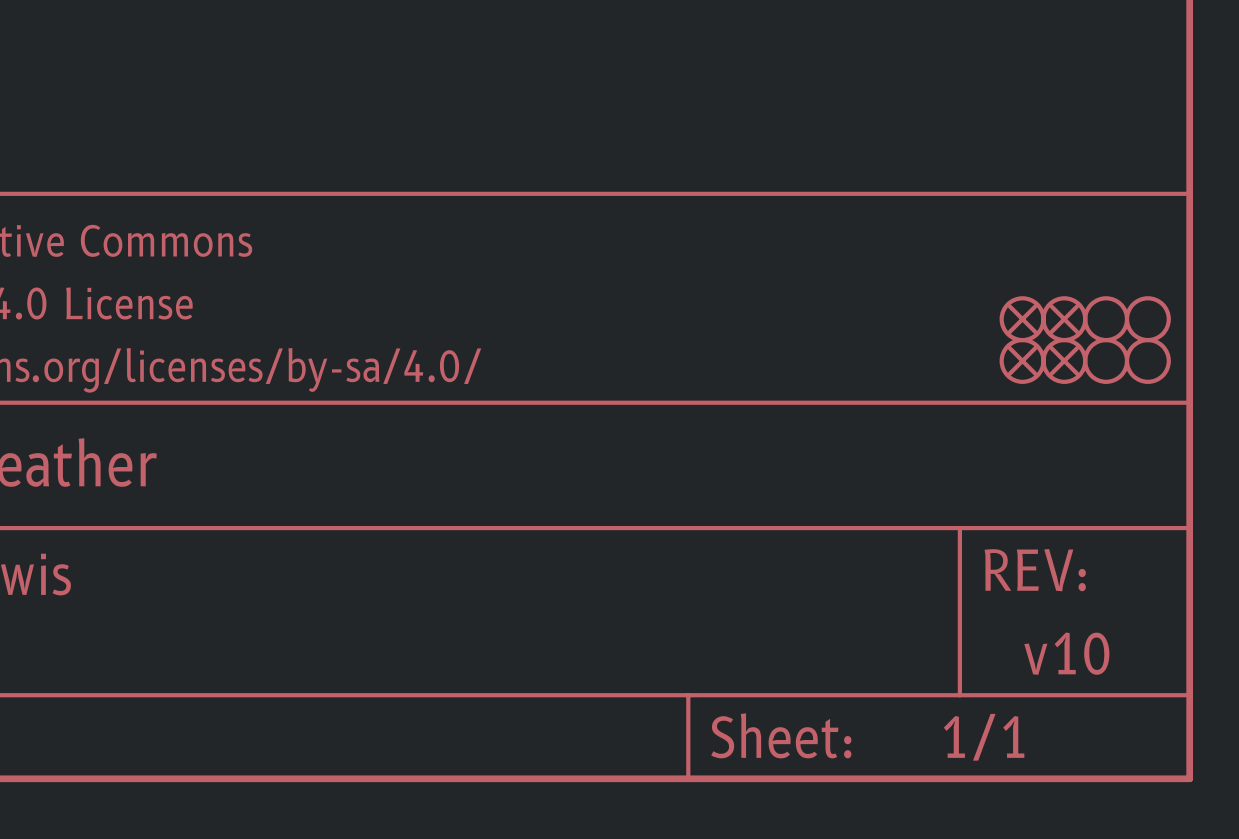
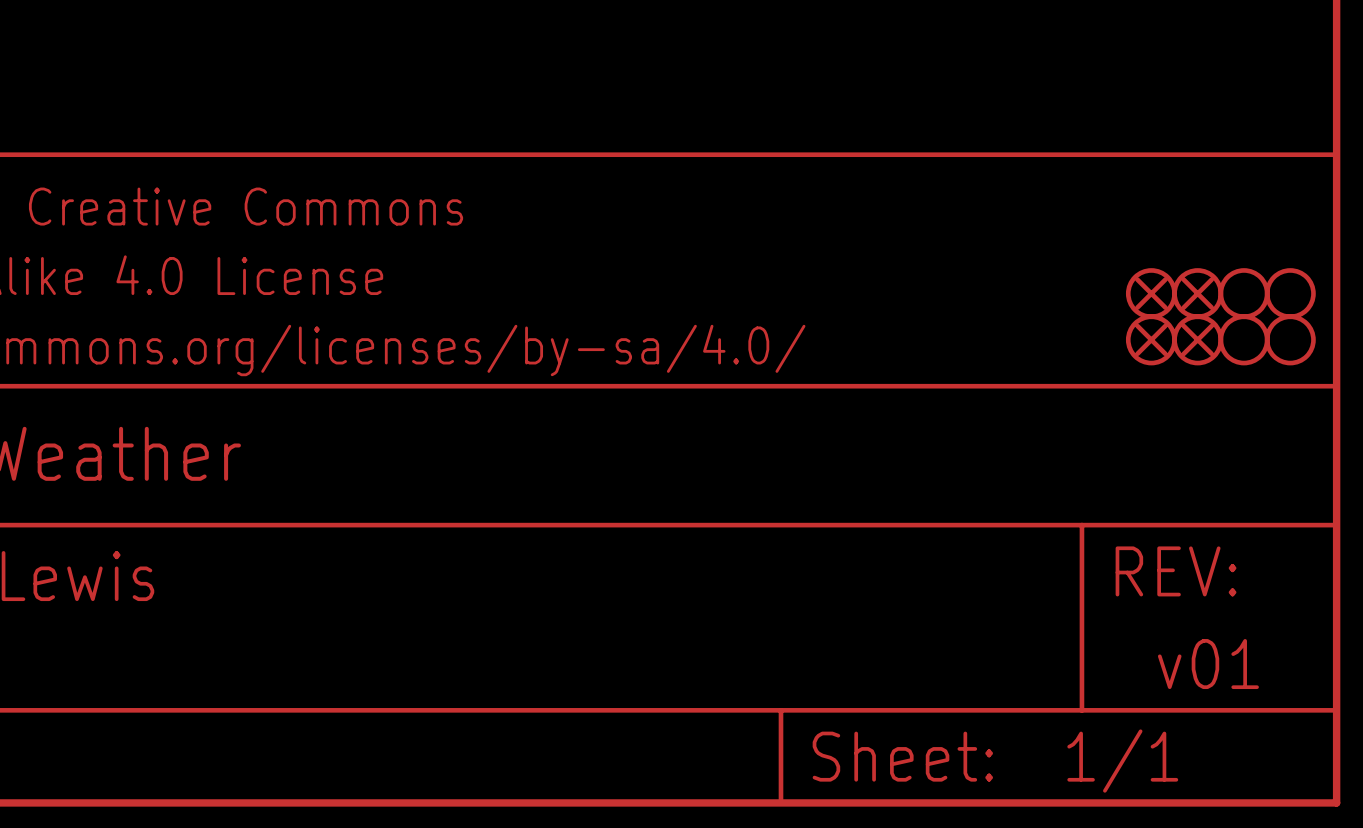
text: v10 (1066, 653) -> v01 (1208, 664)

